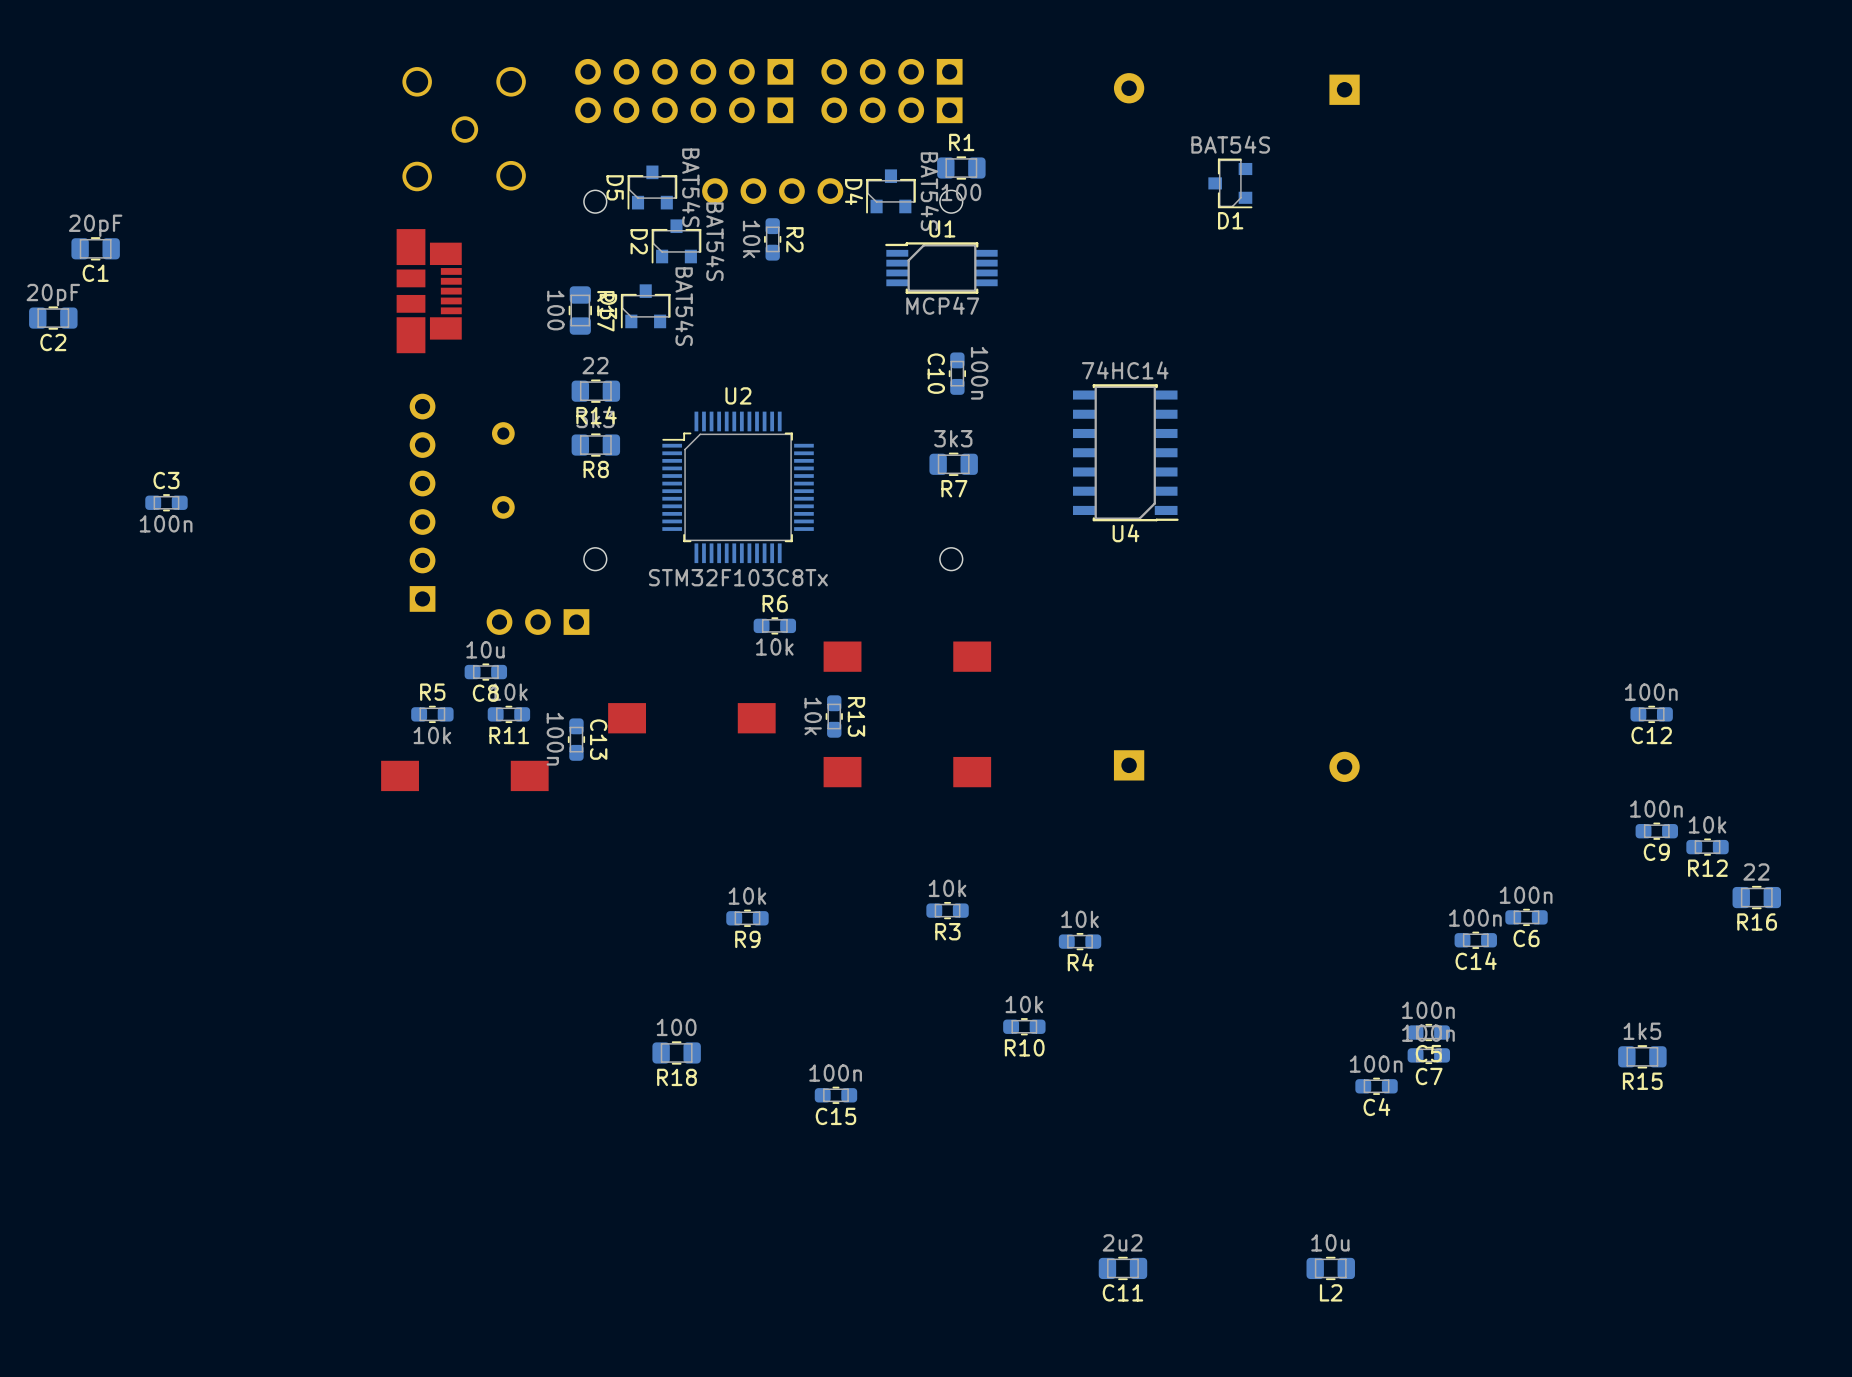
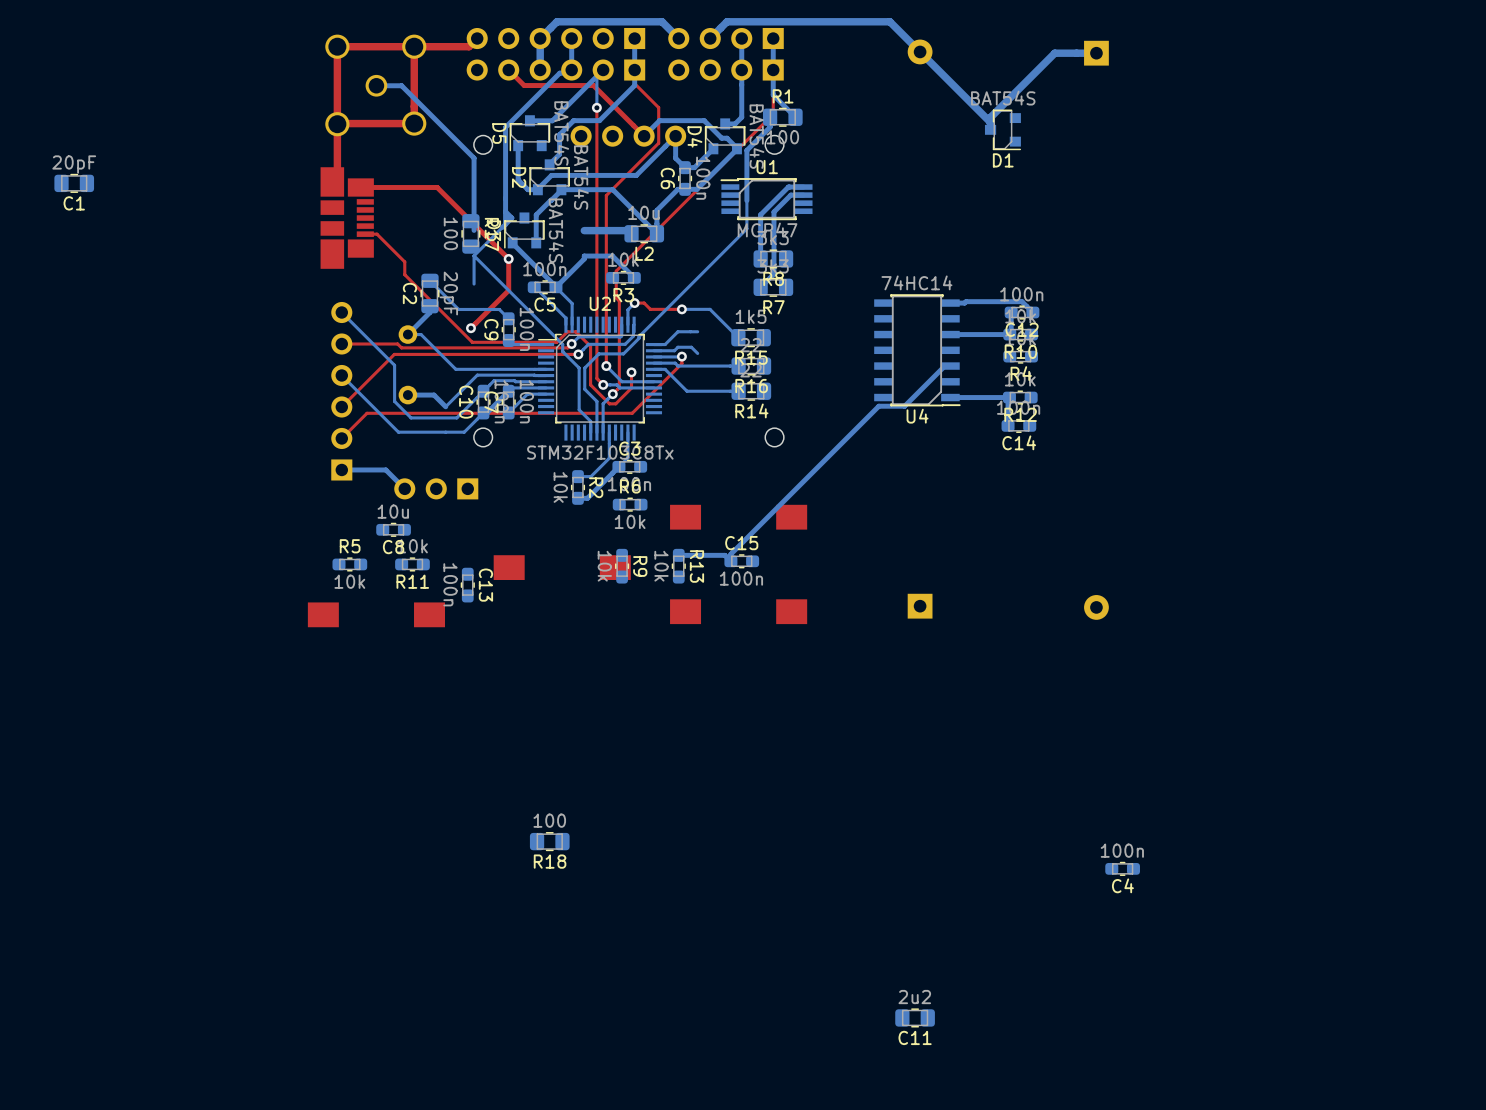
top track: none -> (477, 38) (469, 46) (337, 46) (337, 176) (332, 181)
bottom track: none -> (571, 38) (571, 70) (568, 73) (559, 73) (505, 127) (505, 224)
bottom track: none -> (634, 38) (634, 85) (599, 120) (573, 120) (559, 134) (559, 154) (549, 164)
bottom track: none -> (678, 38) (662, 21) (556, 21) (540, 38) (540, 70)
bottom track: none -> (710, 38) (727, 21) (889, 21) (990, 122)
bottom track: none -> (741, 38) (741, 117) (735, 123) (725, 123)
bottom track: none -> (773, 38) (773, 94) (795, 117)
top track: none -> (414, 46) (414, 123) (337, 124)
bottom track: none -> (1096, 53) (1054, 53) (990, 117) (990, 129)
top track: none -> (508, 70) (524, 85) (593, 85) (644, 136)
top track: none -> (634, 70) (634, 83) (658, 107) (658, 143) (606, 195) (606, 366)
top track: none -> (773, 70) (773, 114) (616, 271) (616, 297) (619, 301) (619, 387) (612, 394)
bottom track: none -> (376, 85) (401, 85) (474, 158) (474, 230)
bottom track: none -> (596, 107) (596, 76) (603, 70) (552, 120) (529, 120)
top track: none -> (596, 107) (596, 378) (603, 384)
via: none -> (596, 107)
bottom track: none -> (770, 117) (770, 127) (746, 150) (746, 228) (623, 353) (598, 353) (584, 368) (584, 389) (596, 401) (596, 432)
bottom track: none -> (644, 136) (659, 120) (704, 120) (721, 138) (727, 138) (736, 149) (696, 189) (677, 189) (656, 210) (656, 233) (612, 189) (561, 189) (536, 214) (536, 242)
bottom track: none -> (518, 145) (518, 179) (527, 189) (537, 189) (551, 175) (636, 175) (675, 136) (675, 158) (685, 167) (694, 167) (713, 148)
R2 position: (772, 239) -> (577, 487)
top track: none -> (360, 187) (437, 187) (508, 258) (508, 290) (470, 328)
bottom track: none -> (803, 187) (788, 187) (760, 214) (760, 258)
bottom track: none -> (803, 195) (790, 195) (773, 212) (773, 273) (760, 287)
bottom track: none -> (505, 211) (511, 218) (474, 255)
bottom track: none -> (584, 230) (628, 230) (631, 233)
top track: none -> (365, 234) (376, 234) (404, 261) (404, 274) (472, 342) (556, 342) (567, 331) (576, 331) (590, 346) (590, 384) (609, 403) (615, 403) (631, 388) (631, 372)
C2 rotation: 0° (53, 318) -> 90° clockwise (429, 293)
C2 position: (53, 318) -> (429, 293)
bottom track: none -> (512, 243) (555, 287)
bottom track: none -> (474, 255) (474, 284)
bottom track: none -> (474, 255) (562, 344) (562, 351) (579, 368) (579, 409) (590, 421) (590, 432)
via: none -> (508, 258)
bottom track: none -> (634, 277) (612, 256) (584, 256) (584, 258) (555, 287)
bottom track: none -> (429, 280) (458, 309) (499, 309) (508, 318)
C10 position: (957, 373) -> (483, 402)
bottom track: none -> (534, 287) (565, 318) (565, 324)
bottom track: none -> (555, 287) (572, 303) (572, 324)
R14 position: (595, 391) -> (751, 391)
bottom track: none -> (634, 303) (627, 309) (627, 324)
top track: none -> (634, 303) (644, 303) (650, 309) (681, 309)
via: none -> (634, 303)
bottom track: none -> (950, 303) (1022, 301) (1032, 312)
bottom track: none -> (429, 306) (429, 312) (407, 334) (421, 334) (455, 369) (546, 369)
bottom track: none -> (681, 309) (710, 309) (738, 337)
via: none -> (681, 309)
bottom track: none -> (341, 312) (394, 365) (394, 401) (411, 417) (456, 417) (494, 380) (546, 381)
bottom track: none -> (1011, 312) (1009, 334) (950, 334)
bottom track: none -> (621, 324) (620, 336) (578, 336) (571, 344)
bottom track: none -> (634, 324) (633, 335) (625, 344) (588, 344) (578, 354)
via: none -> (470, 328)
bottom track: none -> (697, 331) (677, 331) (665, 344) (653, 344)
bottom track: none -> (508, 340) (512, 344) (546, 344)
R8 position: (595, 445) -> (773, 258)
top track: none -> (571, 344) (567, 347) (401, 347) (397, 344) (341, 344)
via: none -> (571, 344)
bottom track: none -> (653, 350) (674, 350) (677, 347) (691, 347) (697, 353)
top track: none -> (578, 354) (394, 354) (341, 406)
via: none -> (578, 354)
bottom track: none -> (681, 356) (653, 356)
top track: none -> (681, 356) (681, 363) (632, 413) (366, 413) (341, 438)
via: none -> (681, 356)
R7 position: (953, 464) -> (773, 287)
bottom track: none -> (653, 363) (675, 363) (678, 366) (738, 366)
bottom track: none -> (606, 366) (622, 381) (653, 381)
via: none -> (606, 366)
bottom track: none -> (950, 366) (944, 366) (904, 406) (878, 406) (730, 554) (730, 561) (724, 555) (678, 555)
bottom track: none -> (653, 369) (665, 369) (687, 391) (738, 391)
via: none -> (631, 372)
bottom track: none -> (341, 375) (398, 432) (464, 432) (512, 387) (546, 387)
bottom track: none -> (546, 375) (477, 375) (445, 406) (434, 395) (407, 395)
bottom track: none -> (603, 384) (616, 384) (619, 387) (653, 387)
via: none -> (603, 384)
C3 position: (166, 502) -> (629, 466)
bottom track: none -> (546, 394) (527, 394) (508, 412)
bottom track: none -> (612, 394) (603, 403) (603, 432)
via: none -> (612, 394)
bottom track: none -> (950, 397) (1009, 397) (1008, 425)
bottom track: none -> (609, 432) (609, 458) (590, 476) (577, 476)
bottom track: none -> (627, 432) (627, 457) (587, 498) (577, 498)
bottom track: none -> (341, 469) (385, 469) (404, 488)
R6 position: (774, 625) -> (630, 504)
C12 position: (1651, 714) -> (1022, 312)
C9 rotation: 0° (1656, 831) -> 90° clockwise (508, 329)
C9 position: (1656, 831) -> (508, 329)
R12 position: (1707, 847) -> (1020, 397)
R9 value position: 10k (747, 896) -> 10k (604, 566)
R16 position: (1756, 897) -> (751, 366)
R3 position: (947, 910) -> (623, 277)
C6 rotation: 0° (1526, 917) -> 90° clockwise (685, 178)
C6 position: (1526, 917) -> (685, 178)
R9 rotation: 0° (747, 918) -> 90° clockwise (622, 566)
R9 position: (747, 918) -> (622, 566)
R9 name position: R9 (747, 939) -> R9 (640, 566)
C14 position: (1475, 940) -> (1018, 425)
R4 position: (1080, 941) -> (1020, 356)
R10 position: (1024, 1026) -> (1020, 334)
C5 position: (1428, 1032) -> (545, 287)
C7 rotation: 0° (1428, 1055) -> 90° clockwise (508, 402)
C7 position: (1428, 1055) -> (508, 402)
R15 position: (1642, 1056) -> (751, 337)
C15 value position: 100n (835, 1073) -> 100n (741, 578)
C15 position: (835, 1095) -> (741, 561)
C15 name position: C15 (835, 1116) -> C15 (741, 543)
L2 position: (1330, 1268) -> (644, 233)

